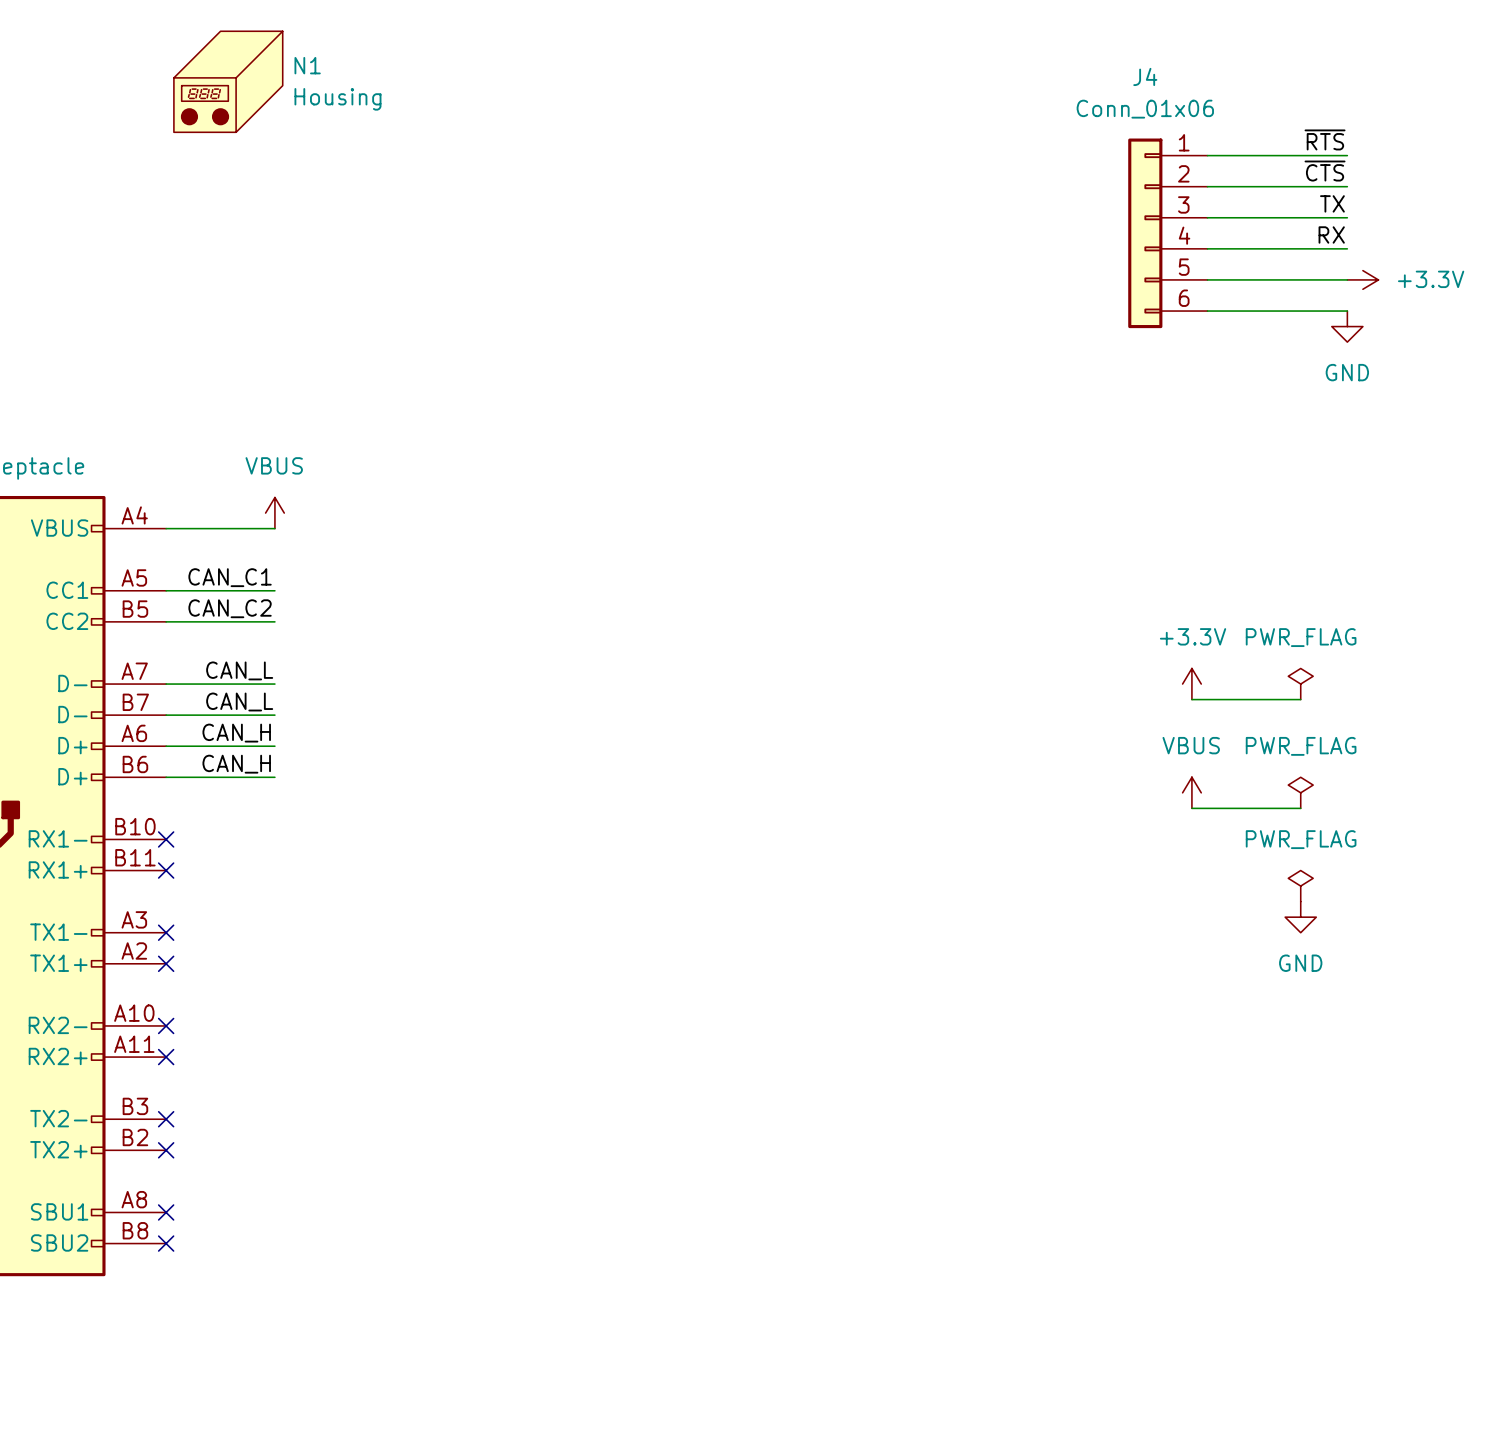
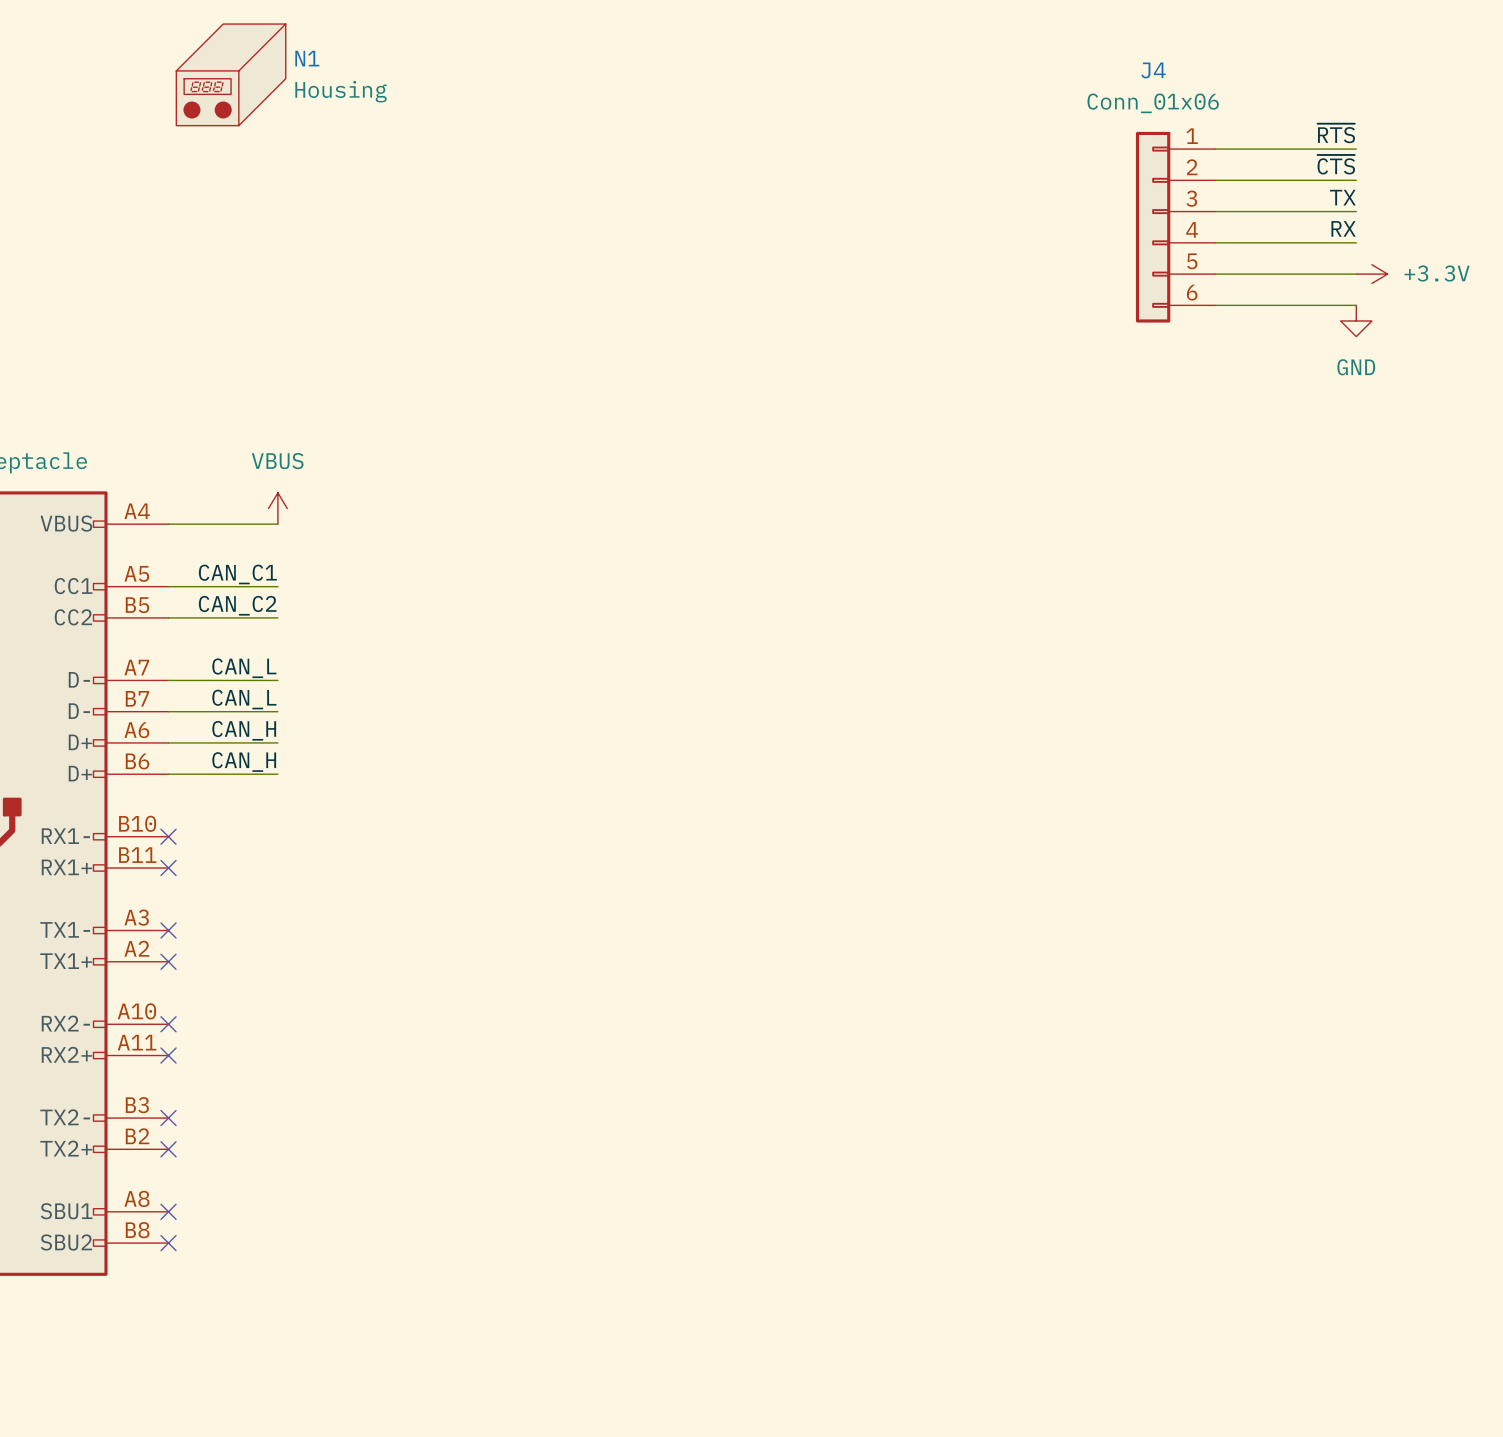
power symbol: +3.3V (1191, 684) -> none
power symbol: PWR_FLAG (1300, 684) -> none
wire: (1191, 699) (1300, 699) -> none
power symbol: VBUS (1191, 792) -> none
power symbol: PWR_FLAG (1300, 792) -> none
wire: (1191, 808) (1300, 808) -> none
power symbol: PWR_FLAG (1300, 886) -> none
power symbol: GND (1300, 917) -> none

